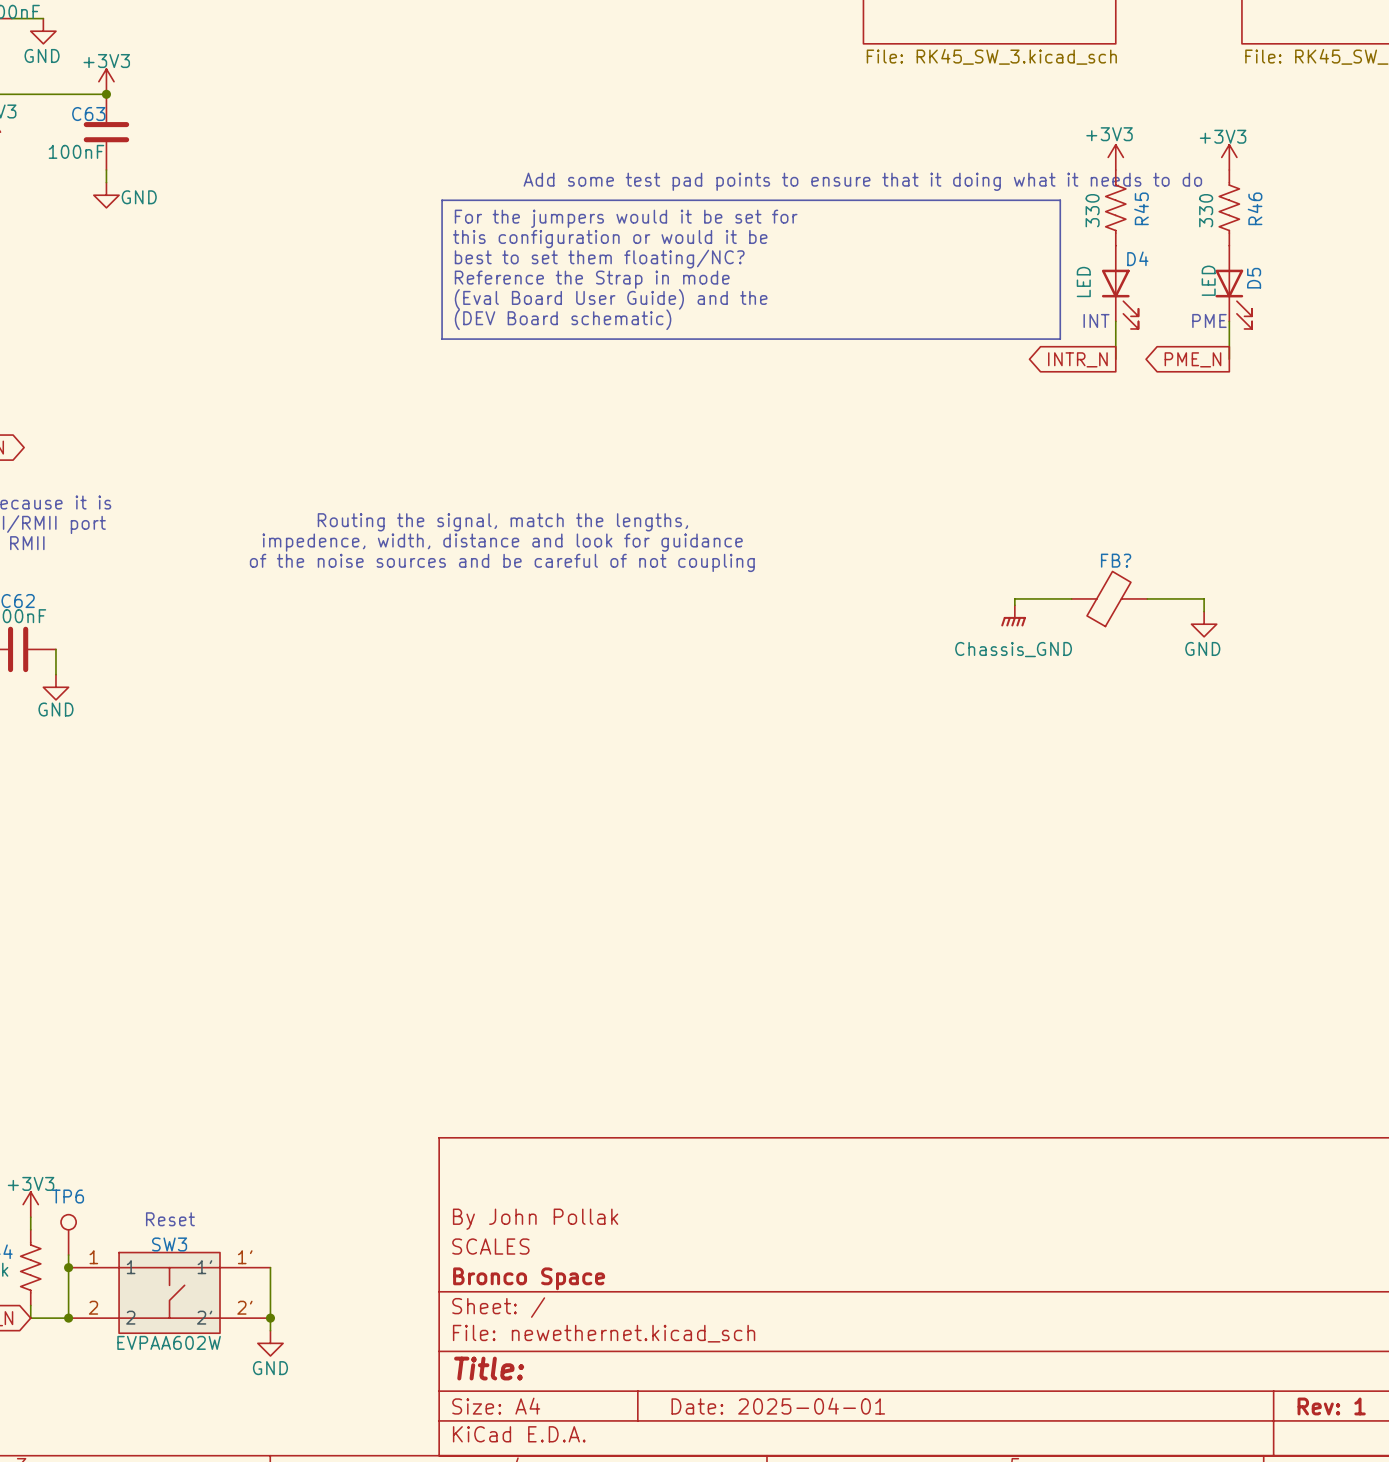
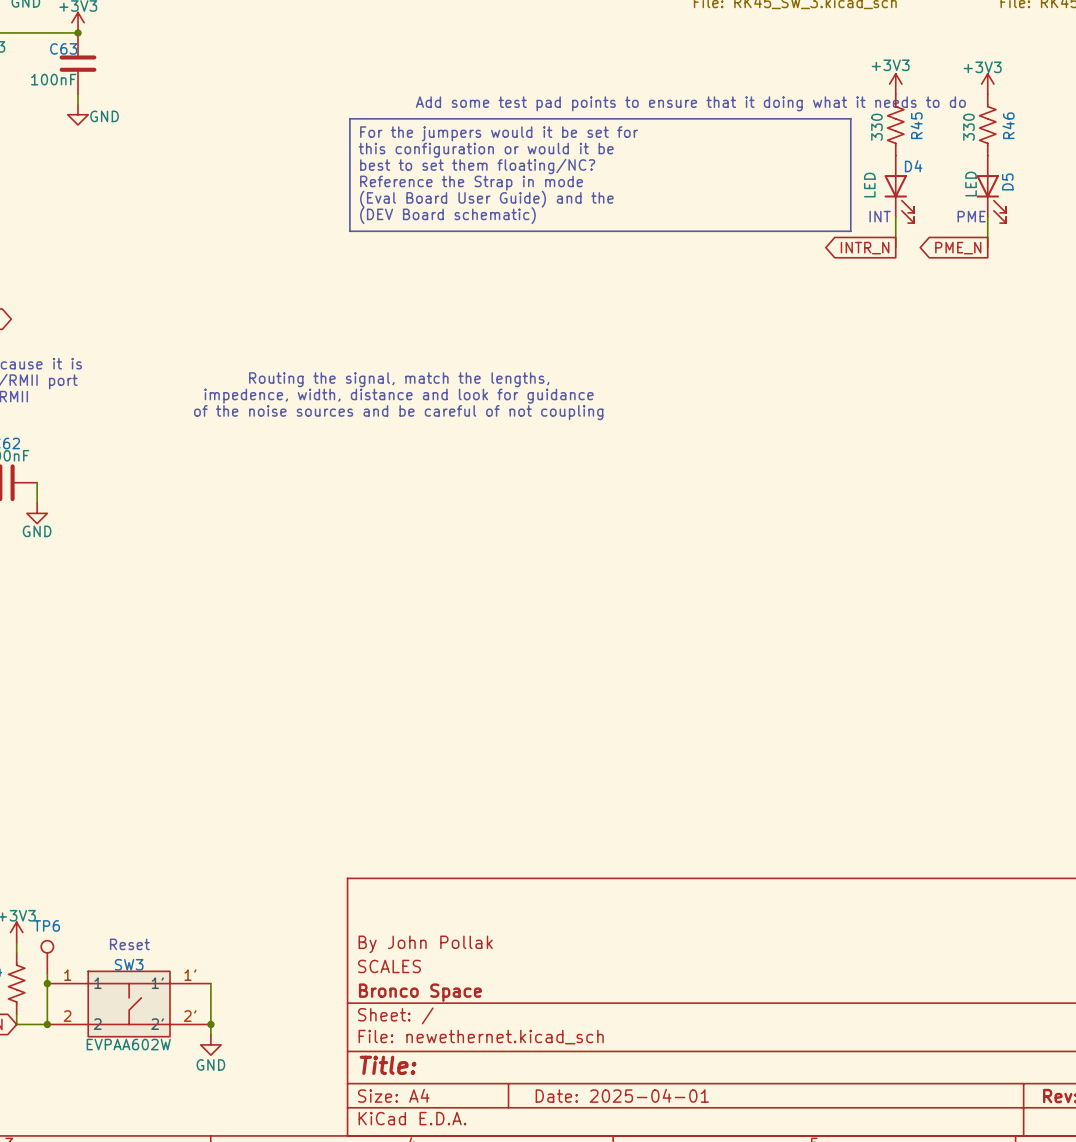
wire: (1071, 598) (1014, 598) (1014, 605) -> none
FB?: (1109, 598) -> none
wire: (1147, 598) (1204, 598) (1204, 611) -> none
power symbol: Chassis_GND (1013, 615) -> none
power symbol: GND (1204, 624) -> none

